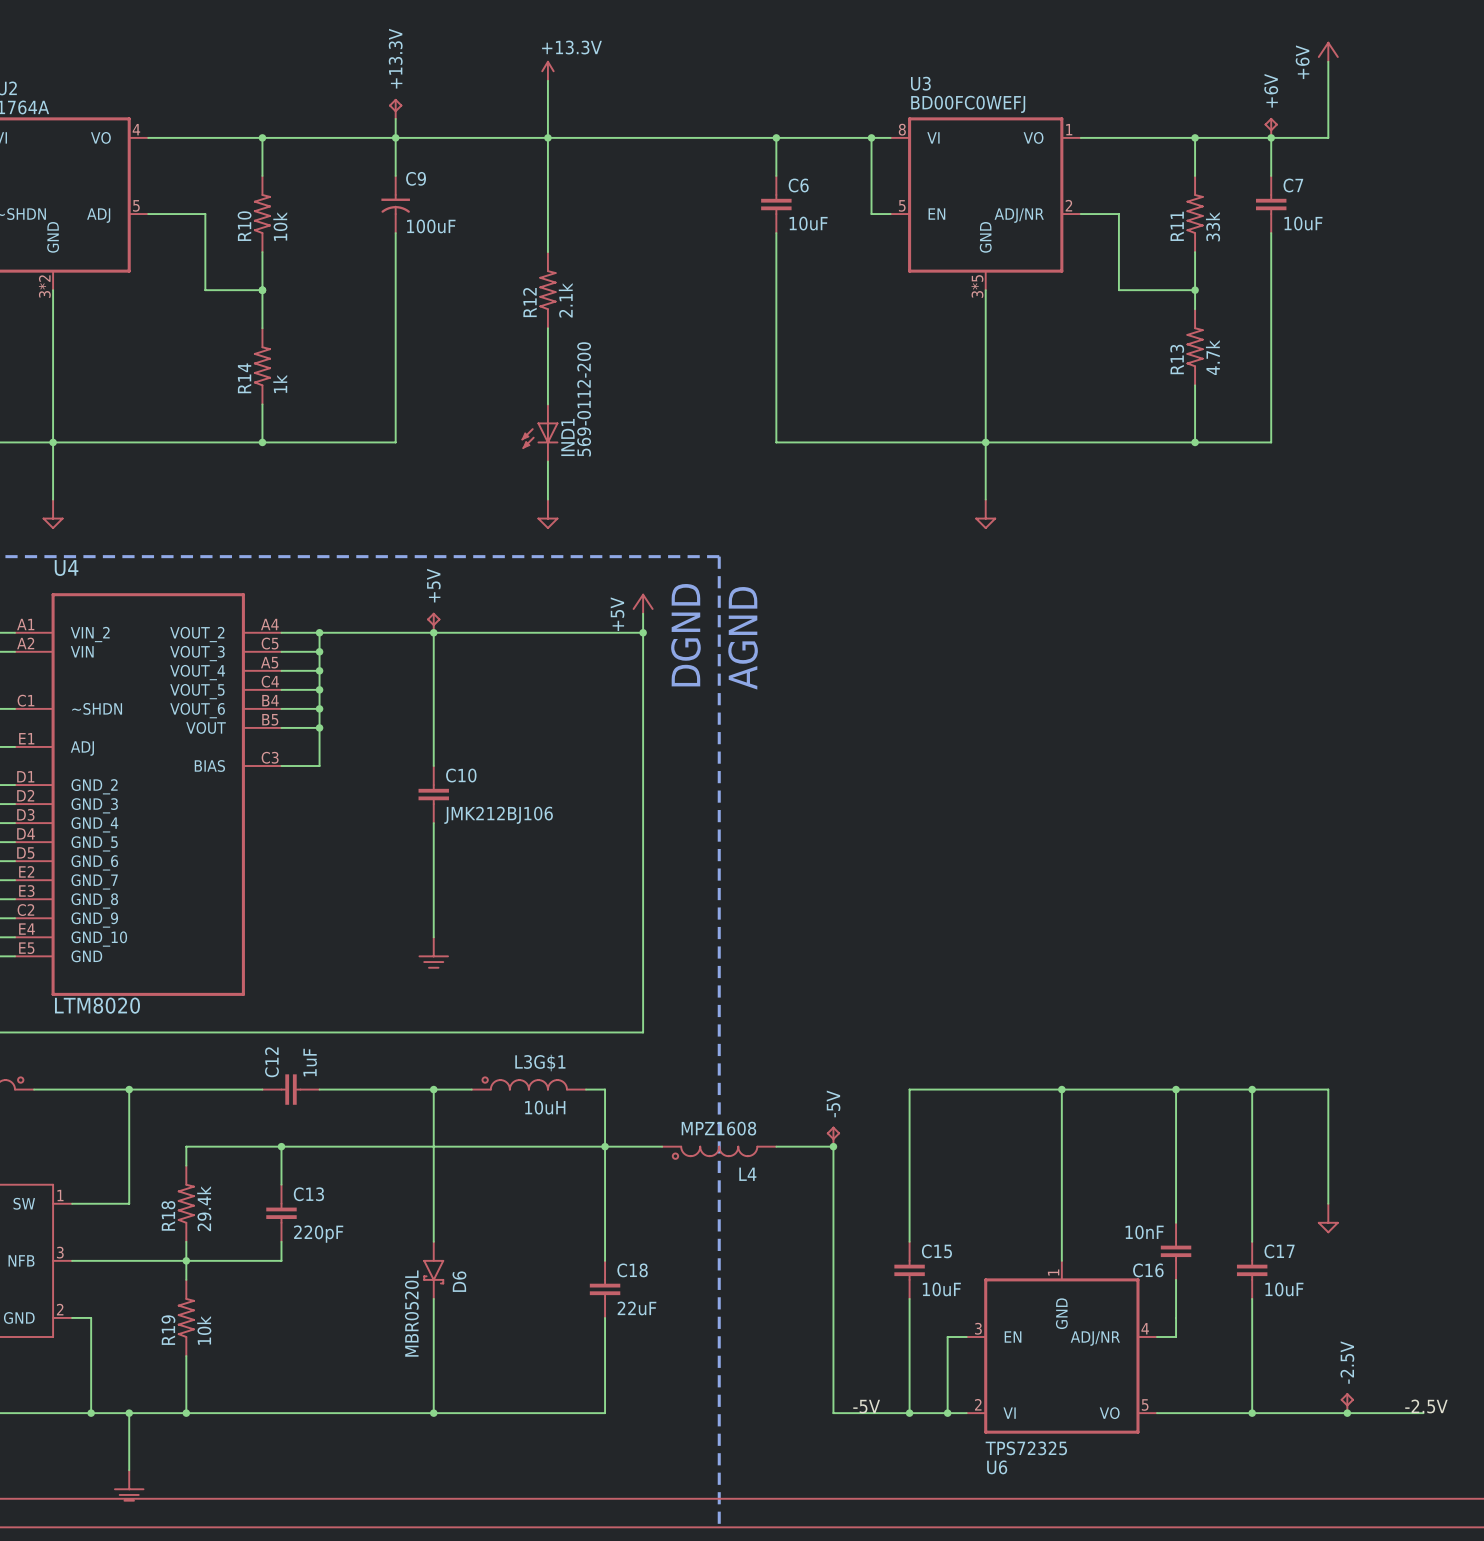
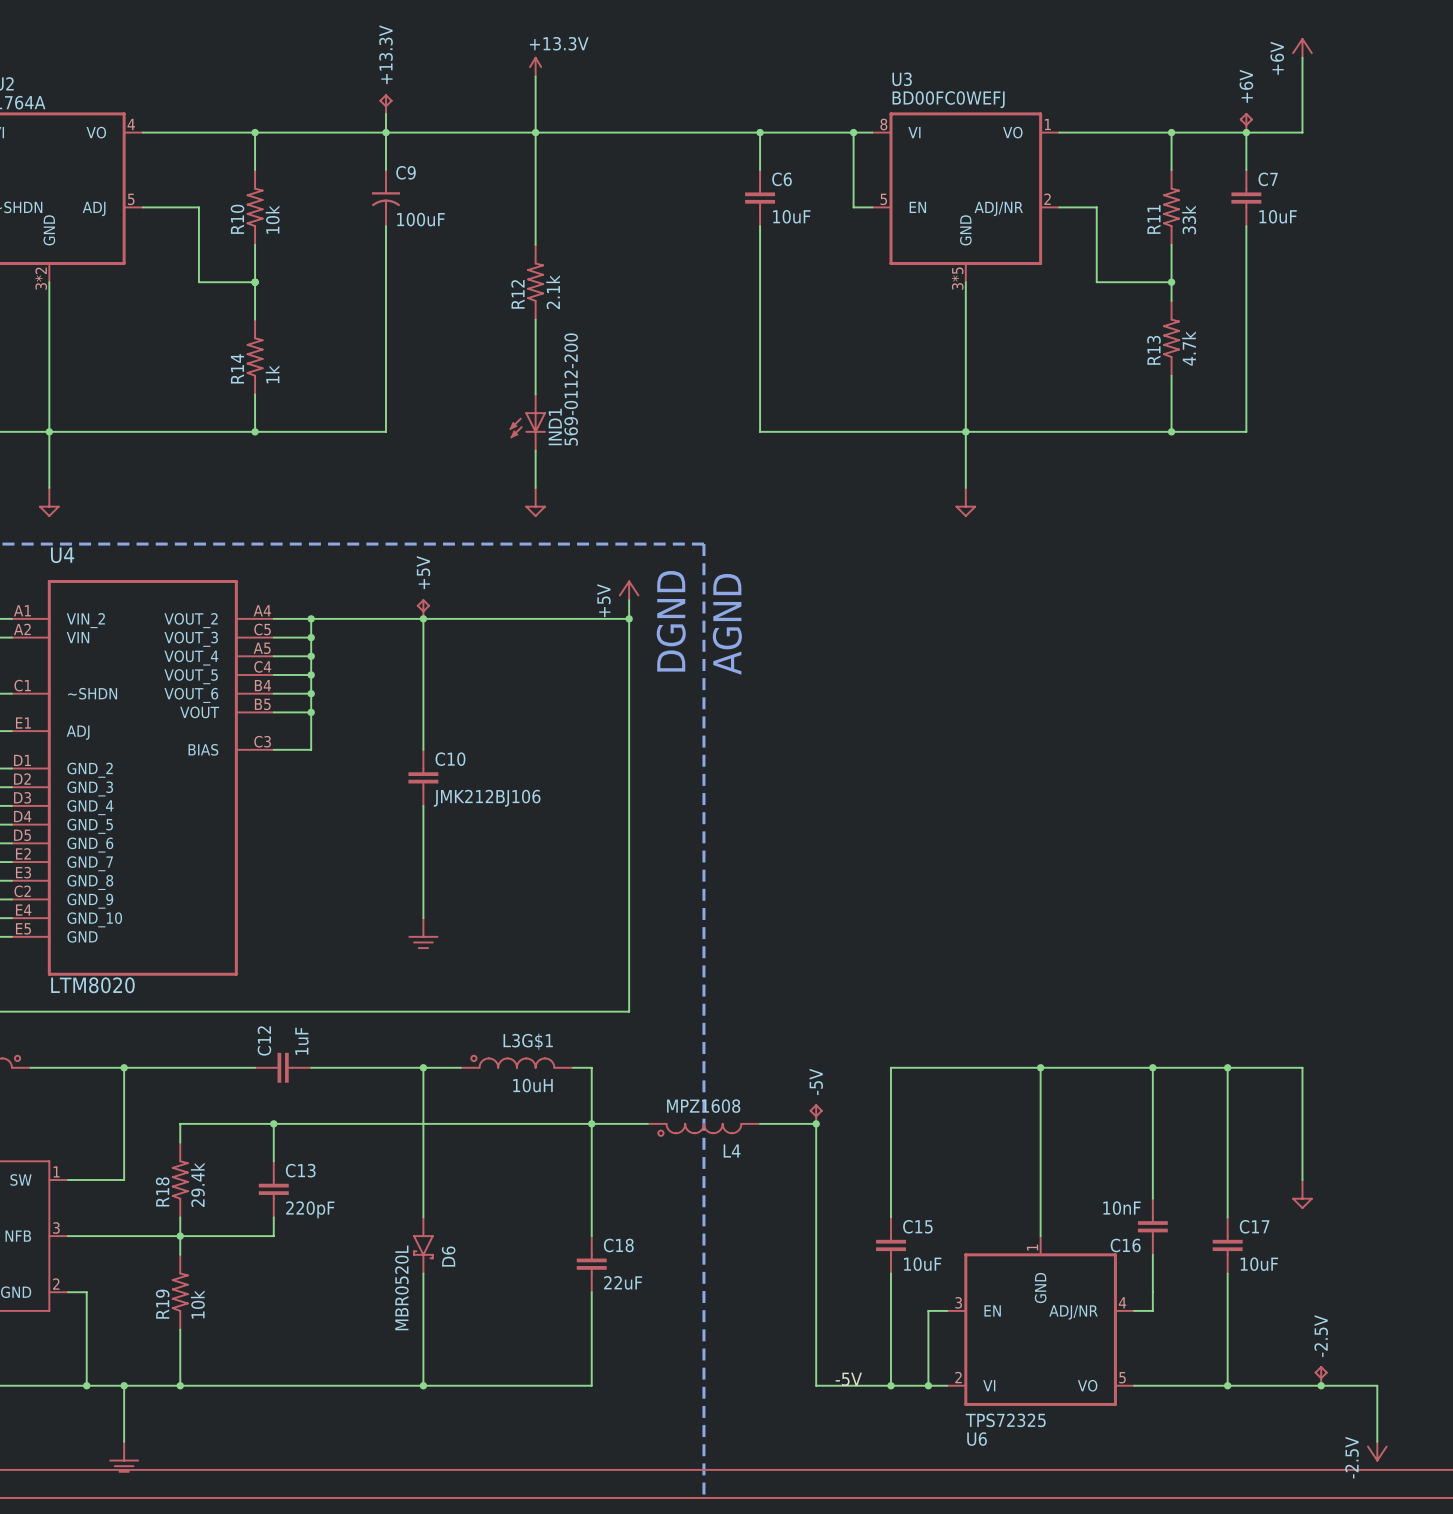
label: -2.5V (1426, 1406) -> none
wire: (1404, 1413) (1423, 1413) -> (1377, 1385) (1377, 1441)
part: none -> -2.5V (1377, 1451)

